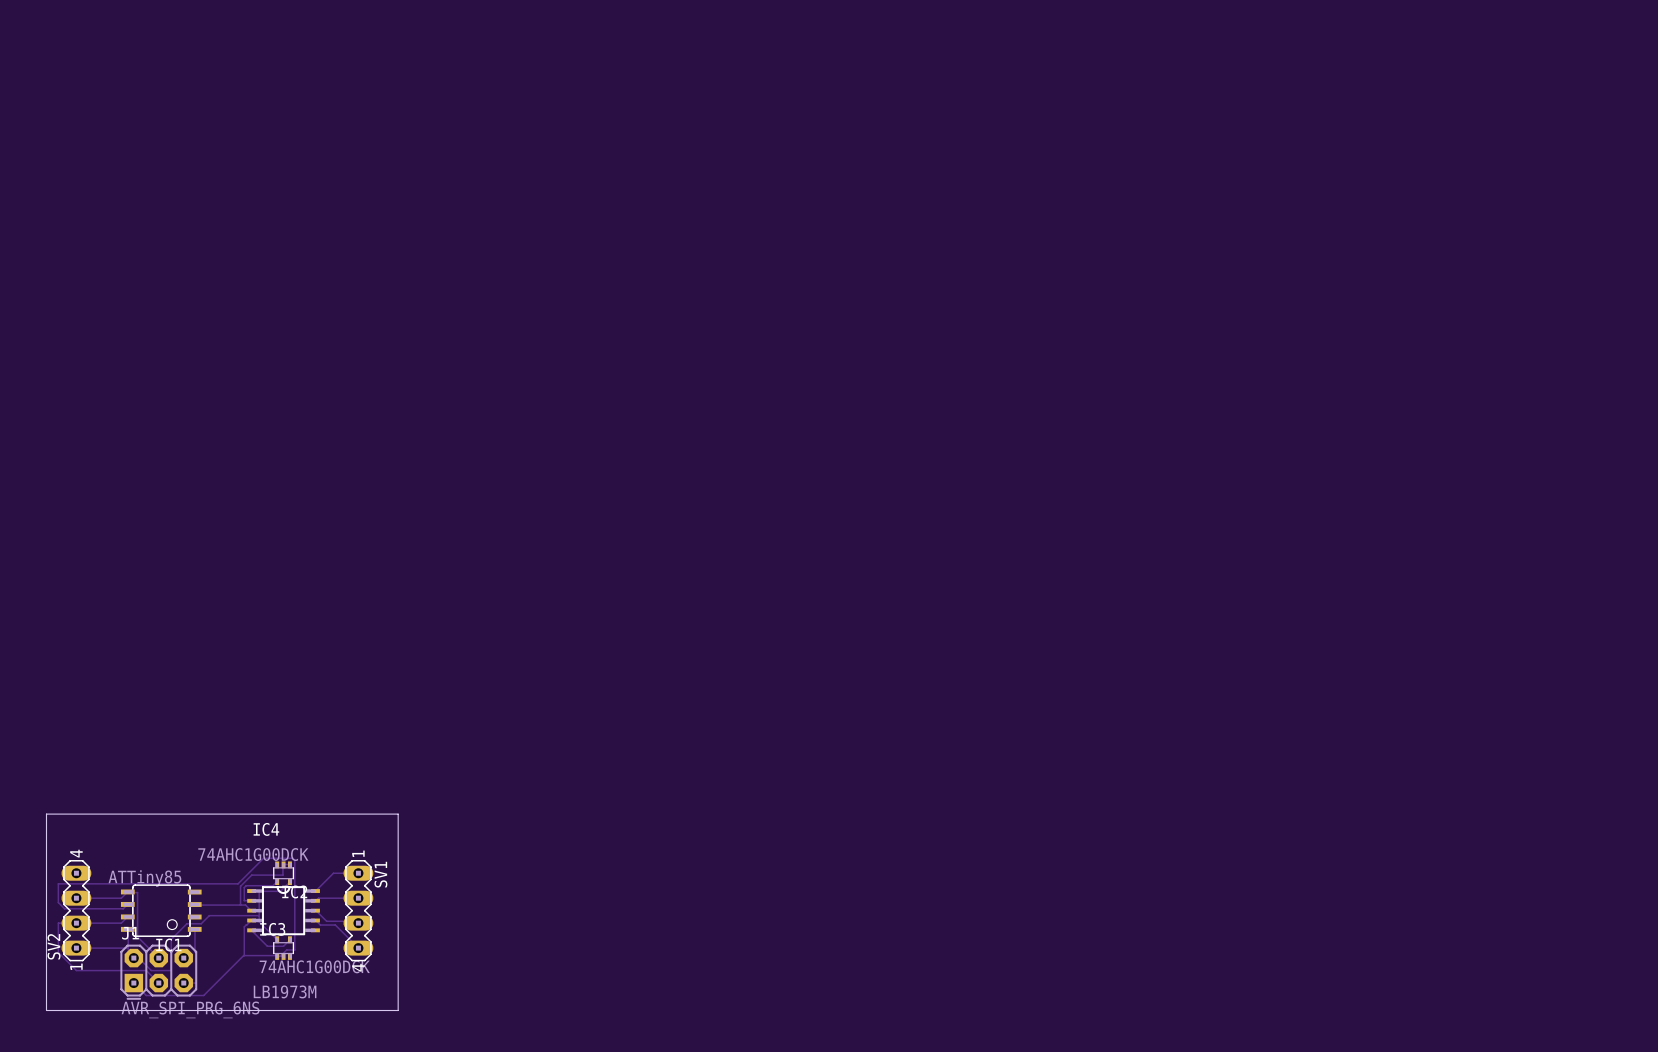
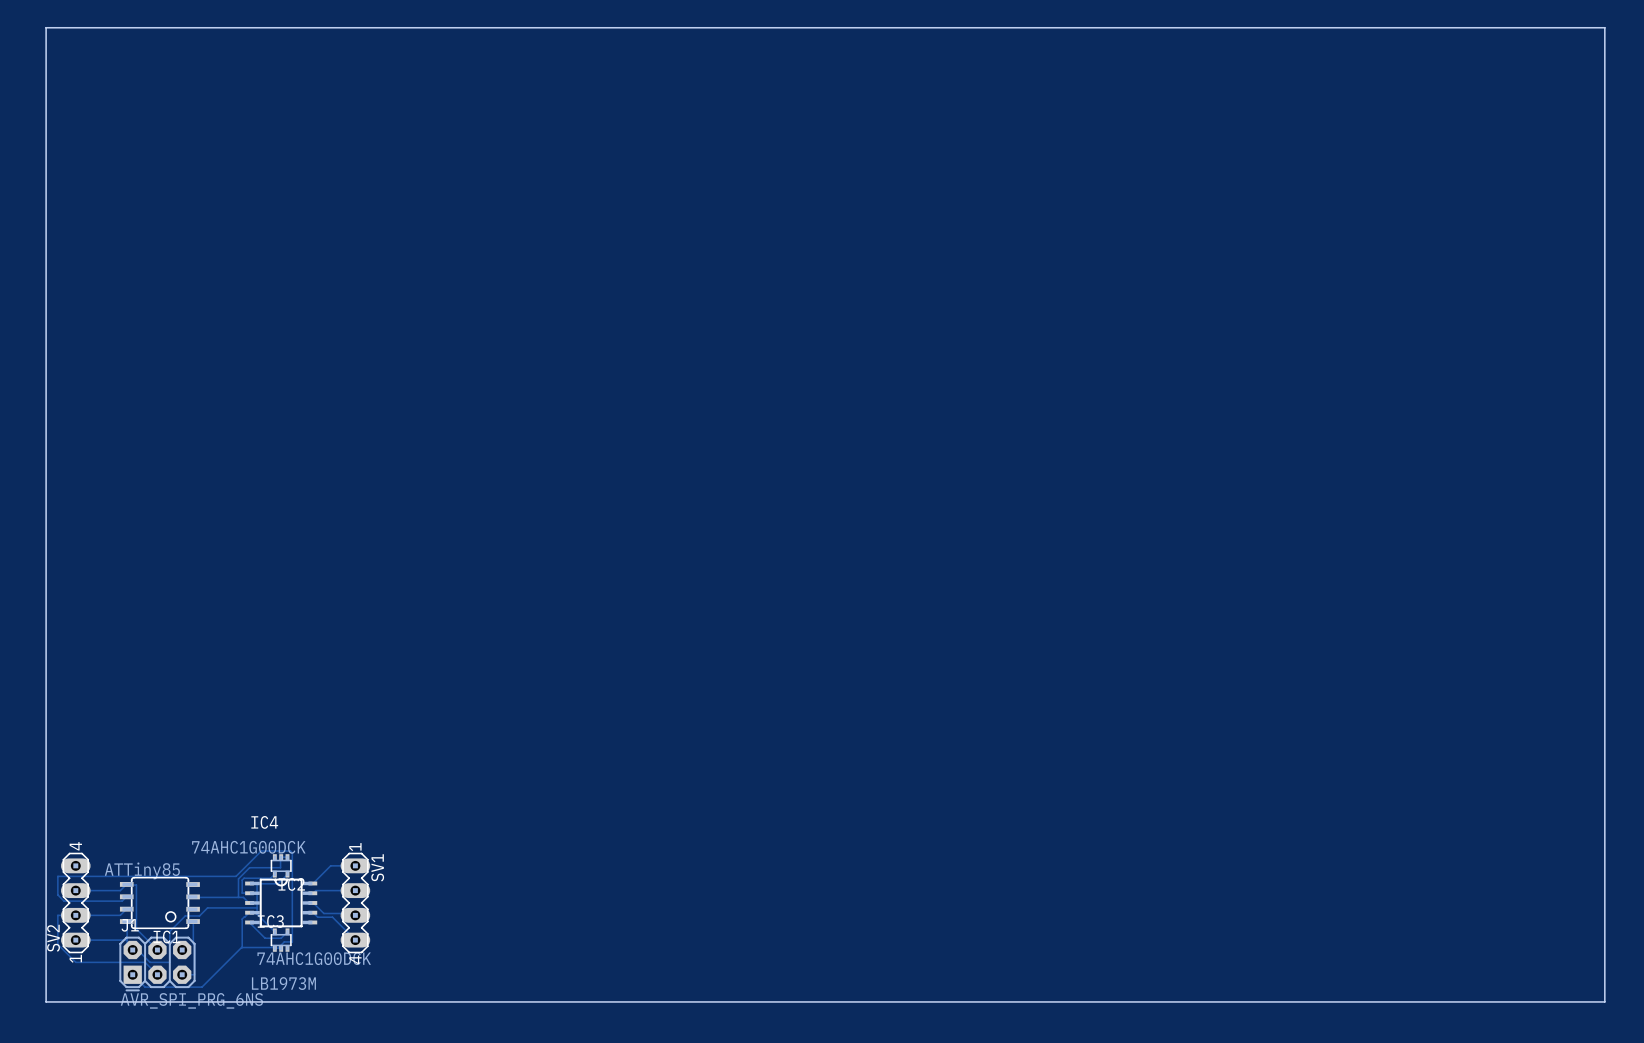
board edge: (46, 814) (398, 814) (398, 1010) -> (46, 807) (46, 27) (1604, 27) (1604, 1001) (394, 1001)

